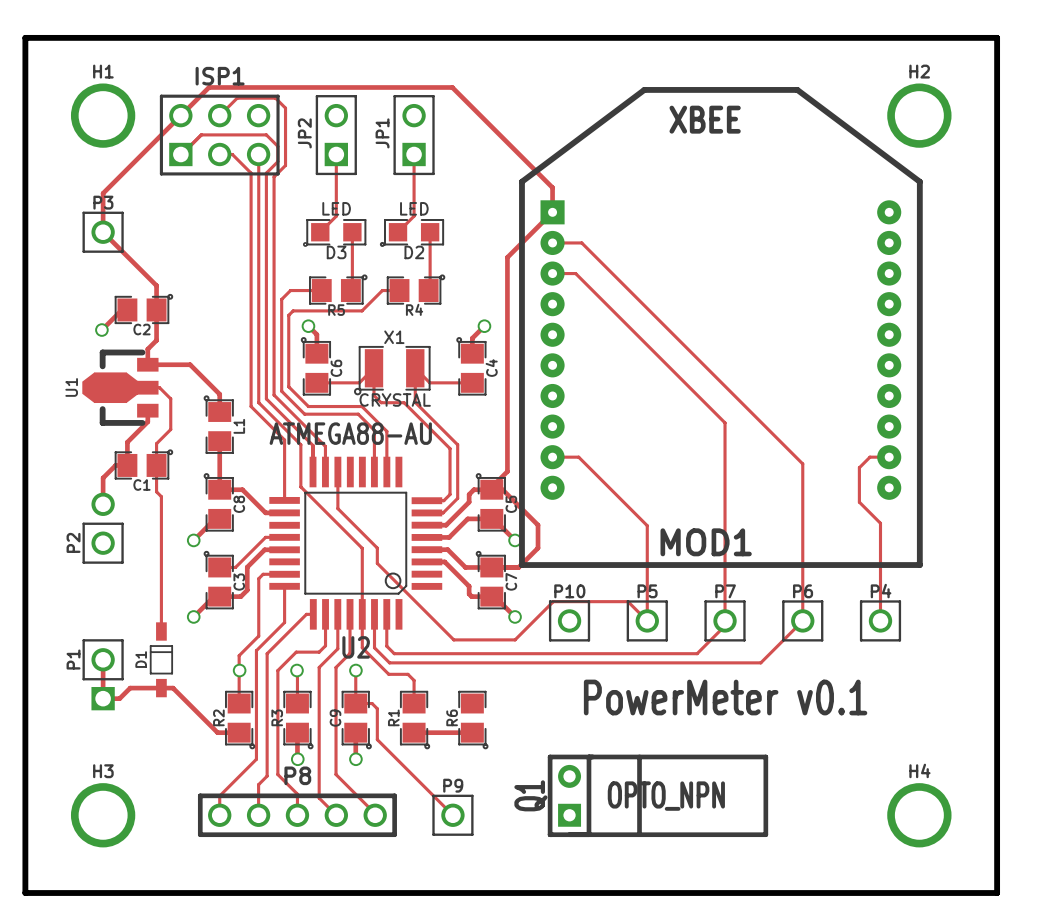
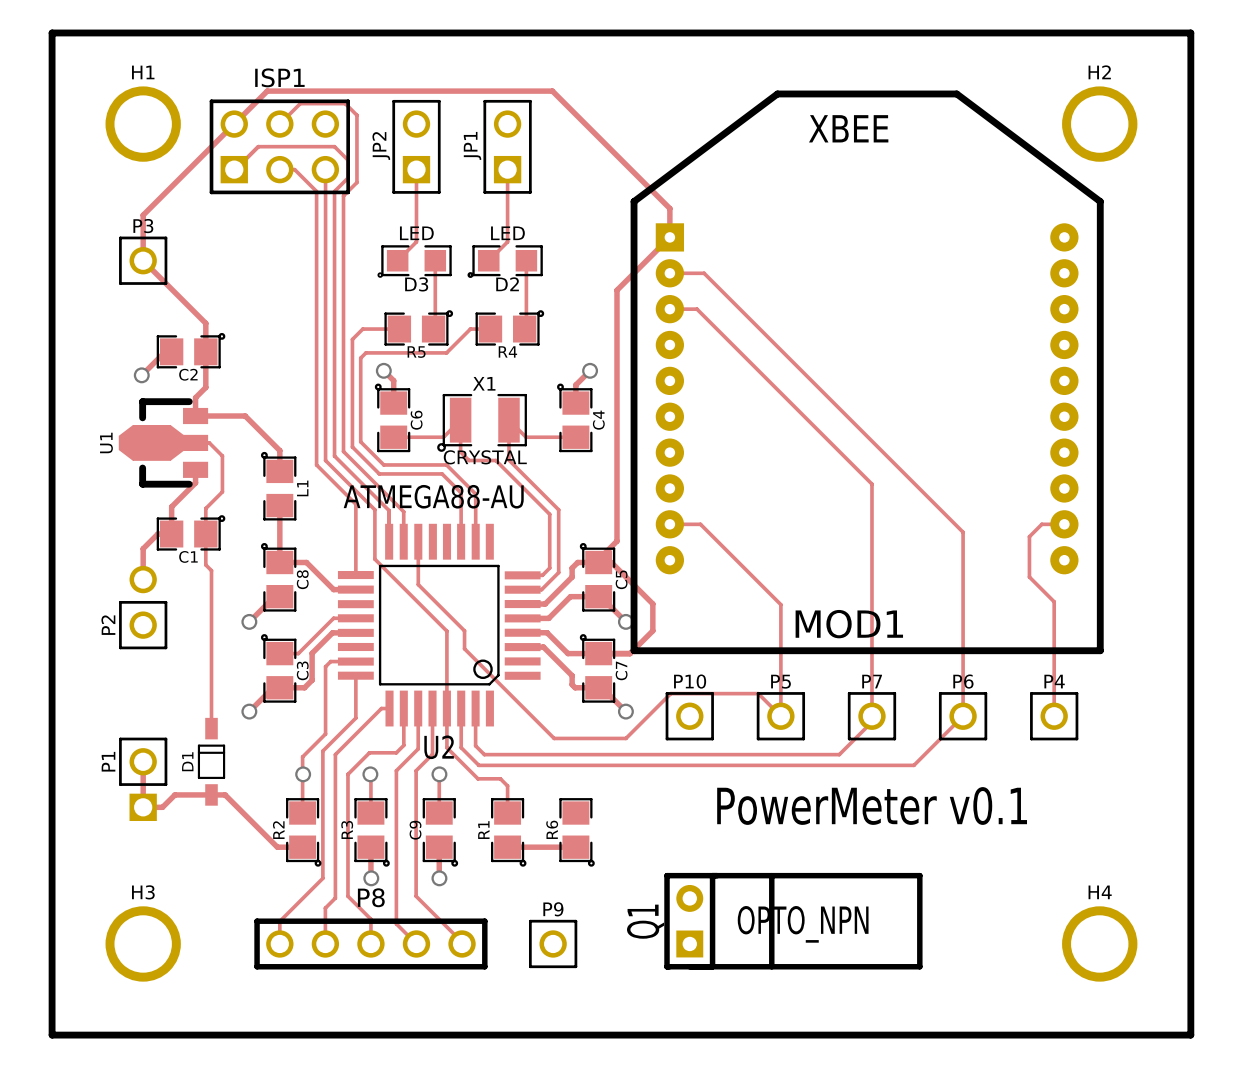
track: (355, 703) (372, 703) (377, 708) (377, 739) (452, 815) -> none

